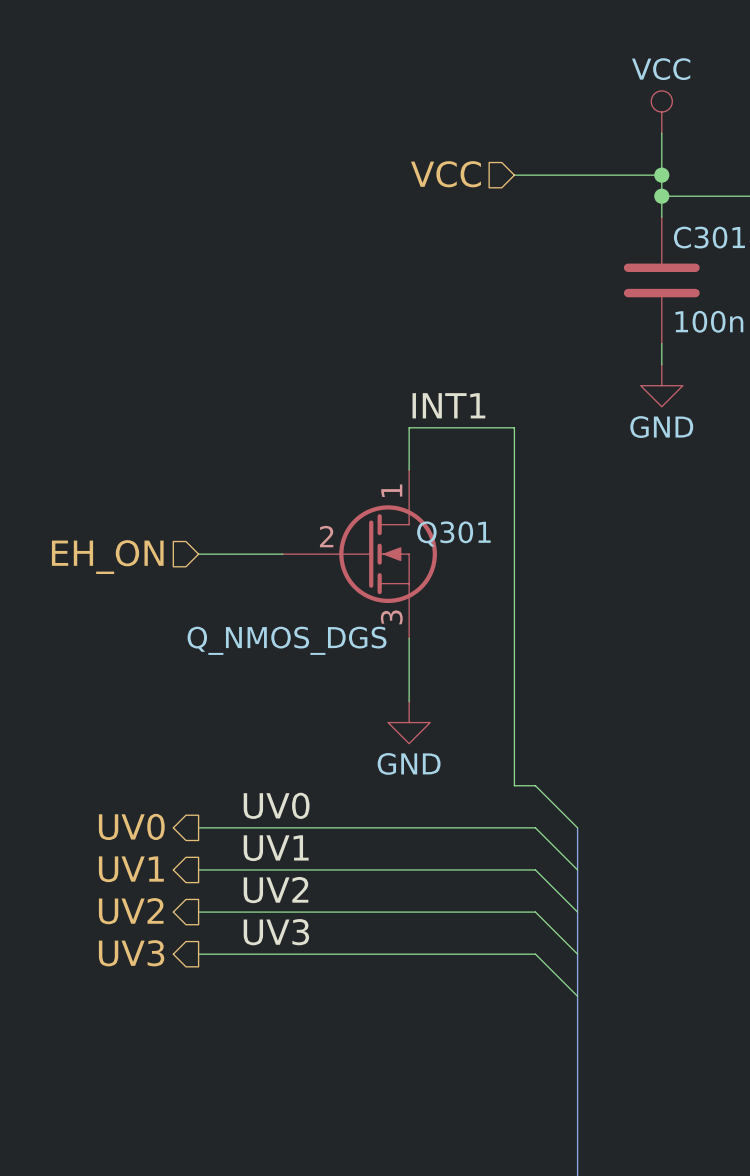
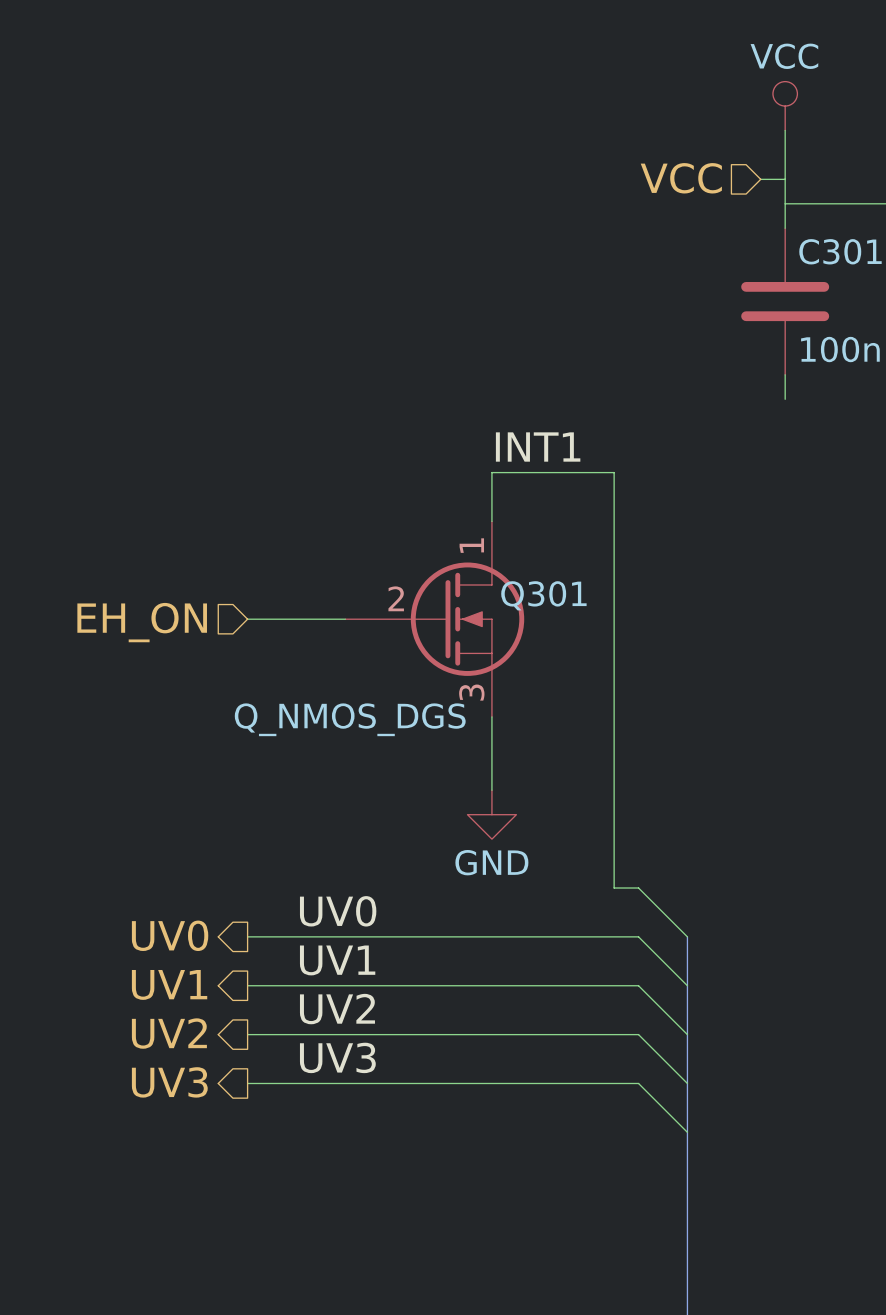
hierarchical label position: VCC (445, 174) -> VCC (681, 178)
wire: (514, 175) (640, 175) -> none
junction: (661, 175) -> none
junction: (661, 196) -> none
power symbol: GND (661, 385) -> none

